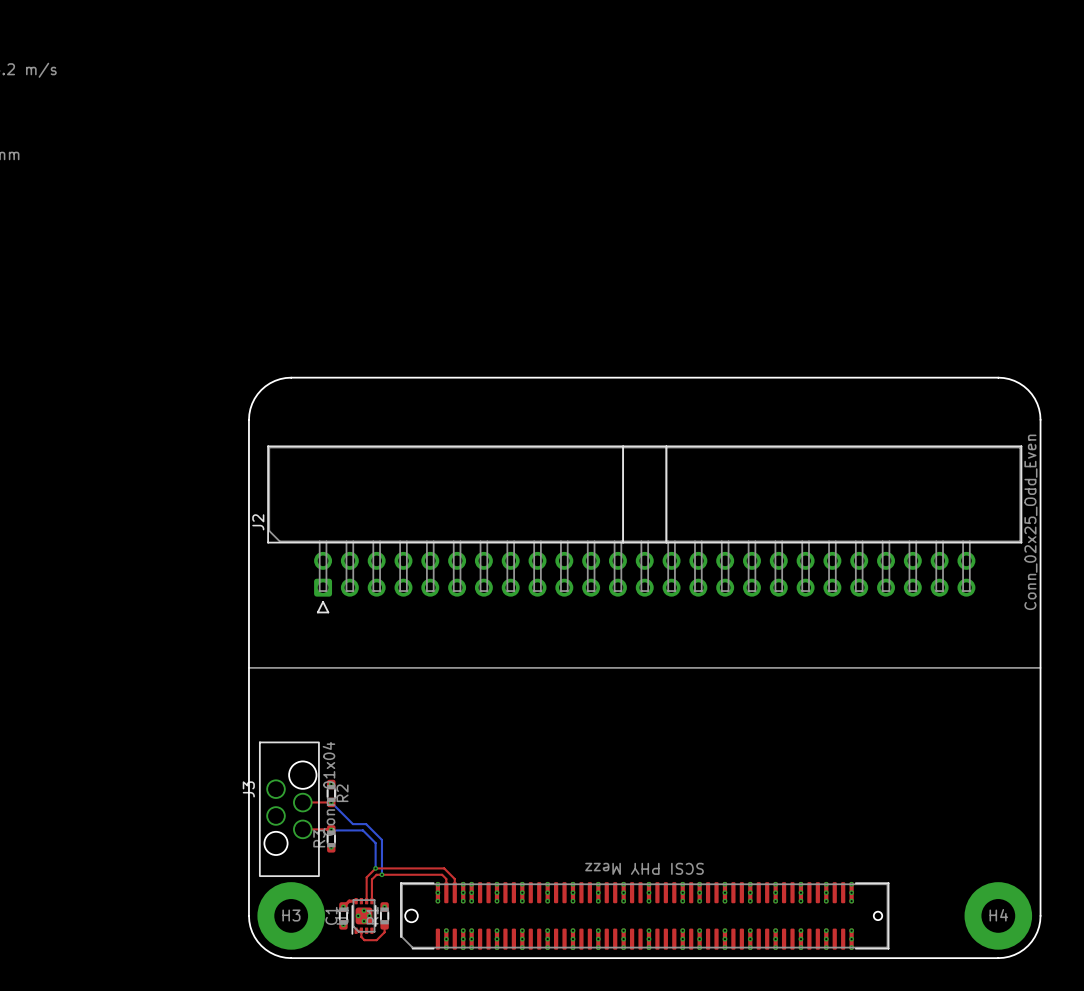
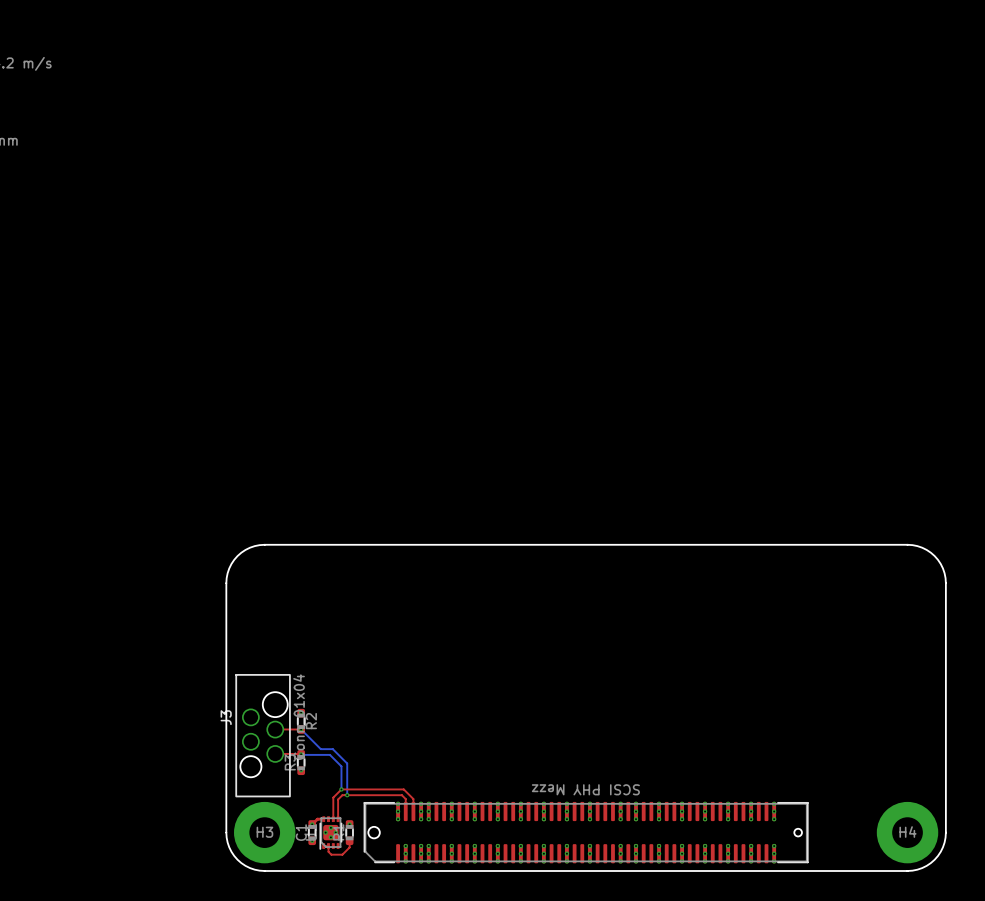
J2: Conn_02x25_Odd_Even (644, 529) -> none
board edge: (248, 641) (249, 414) (254, 398) (261, 390) (275, 380) (291, 377) (998, 377) (1014, 380) (1031, 394) (1040, 414) (1040, 641) -> (226, 583) (229, 568) (237, 556) (250, 547) (264, 544) (907, 544) (922, 547) (934, 556) (942, 568) (945, 583)
line: (248, 667) (1040, 667) -> none

